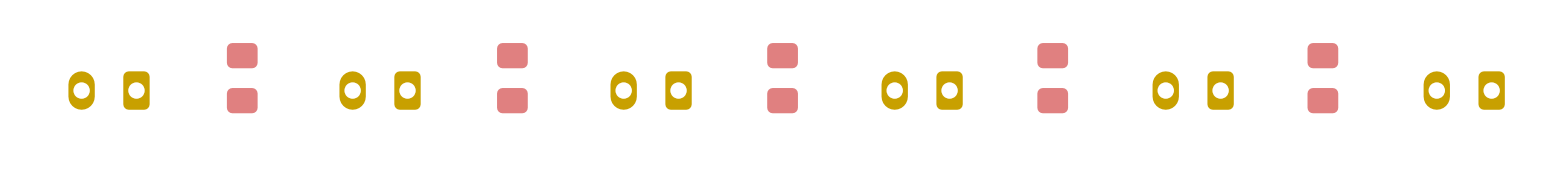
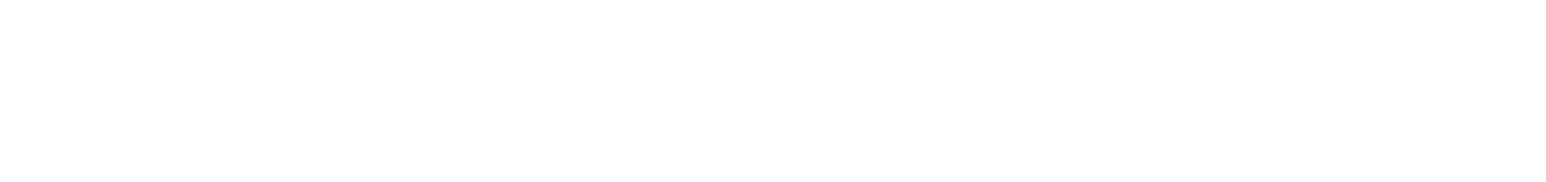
part: (242, 78) -> none
part: (512, 78) -> none
part: (782, 78) -> none
part: (1052, 78) -> none
part: (1322, 78) -> none
part: (109, 90) -> none
part: (380, 90) -> none
part: (651, 90) -> none
part: (922, 90) -> none
part: (1193, 90) -> none
part: (1464, 90) -> none

